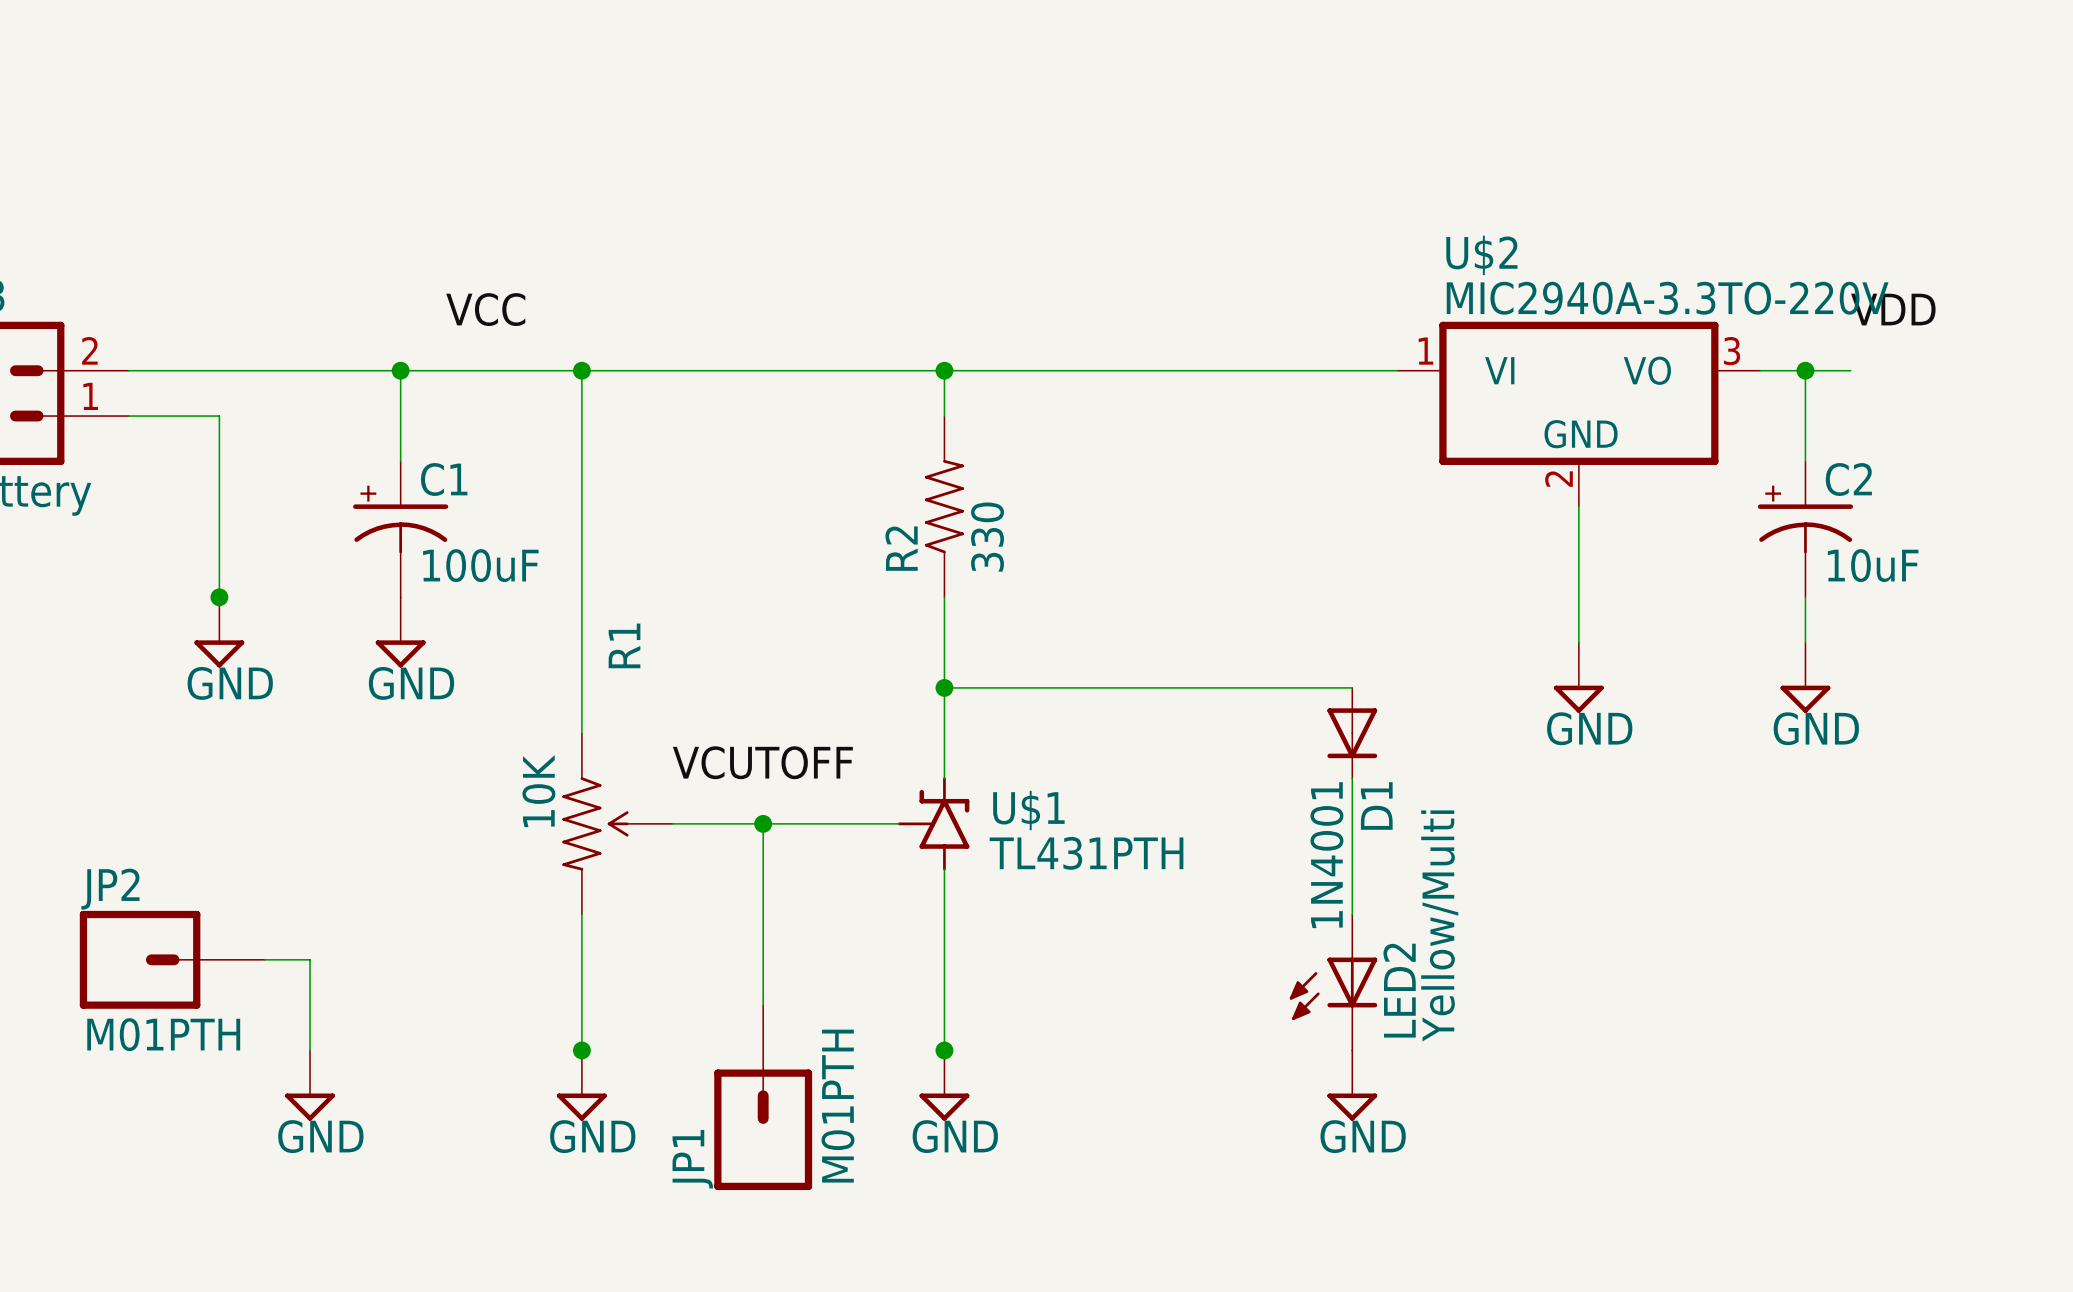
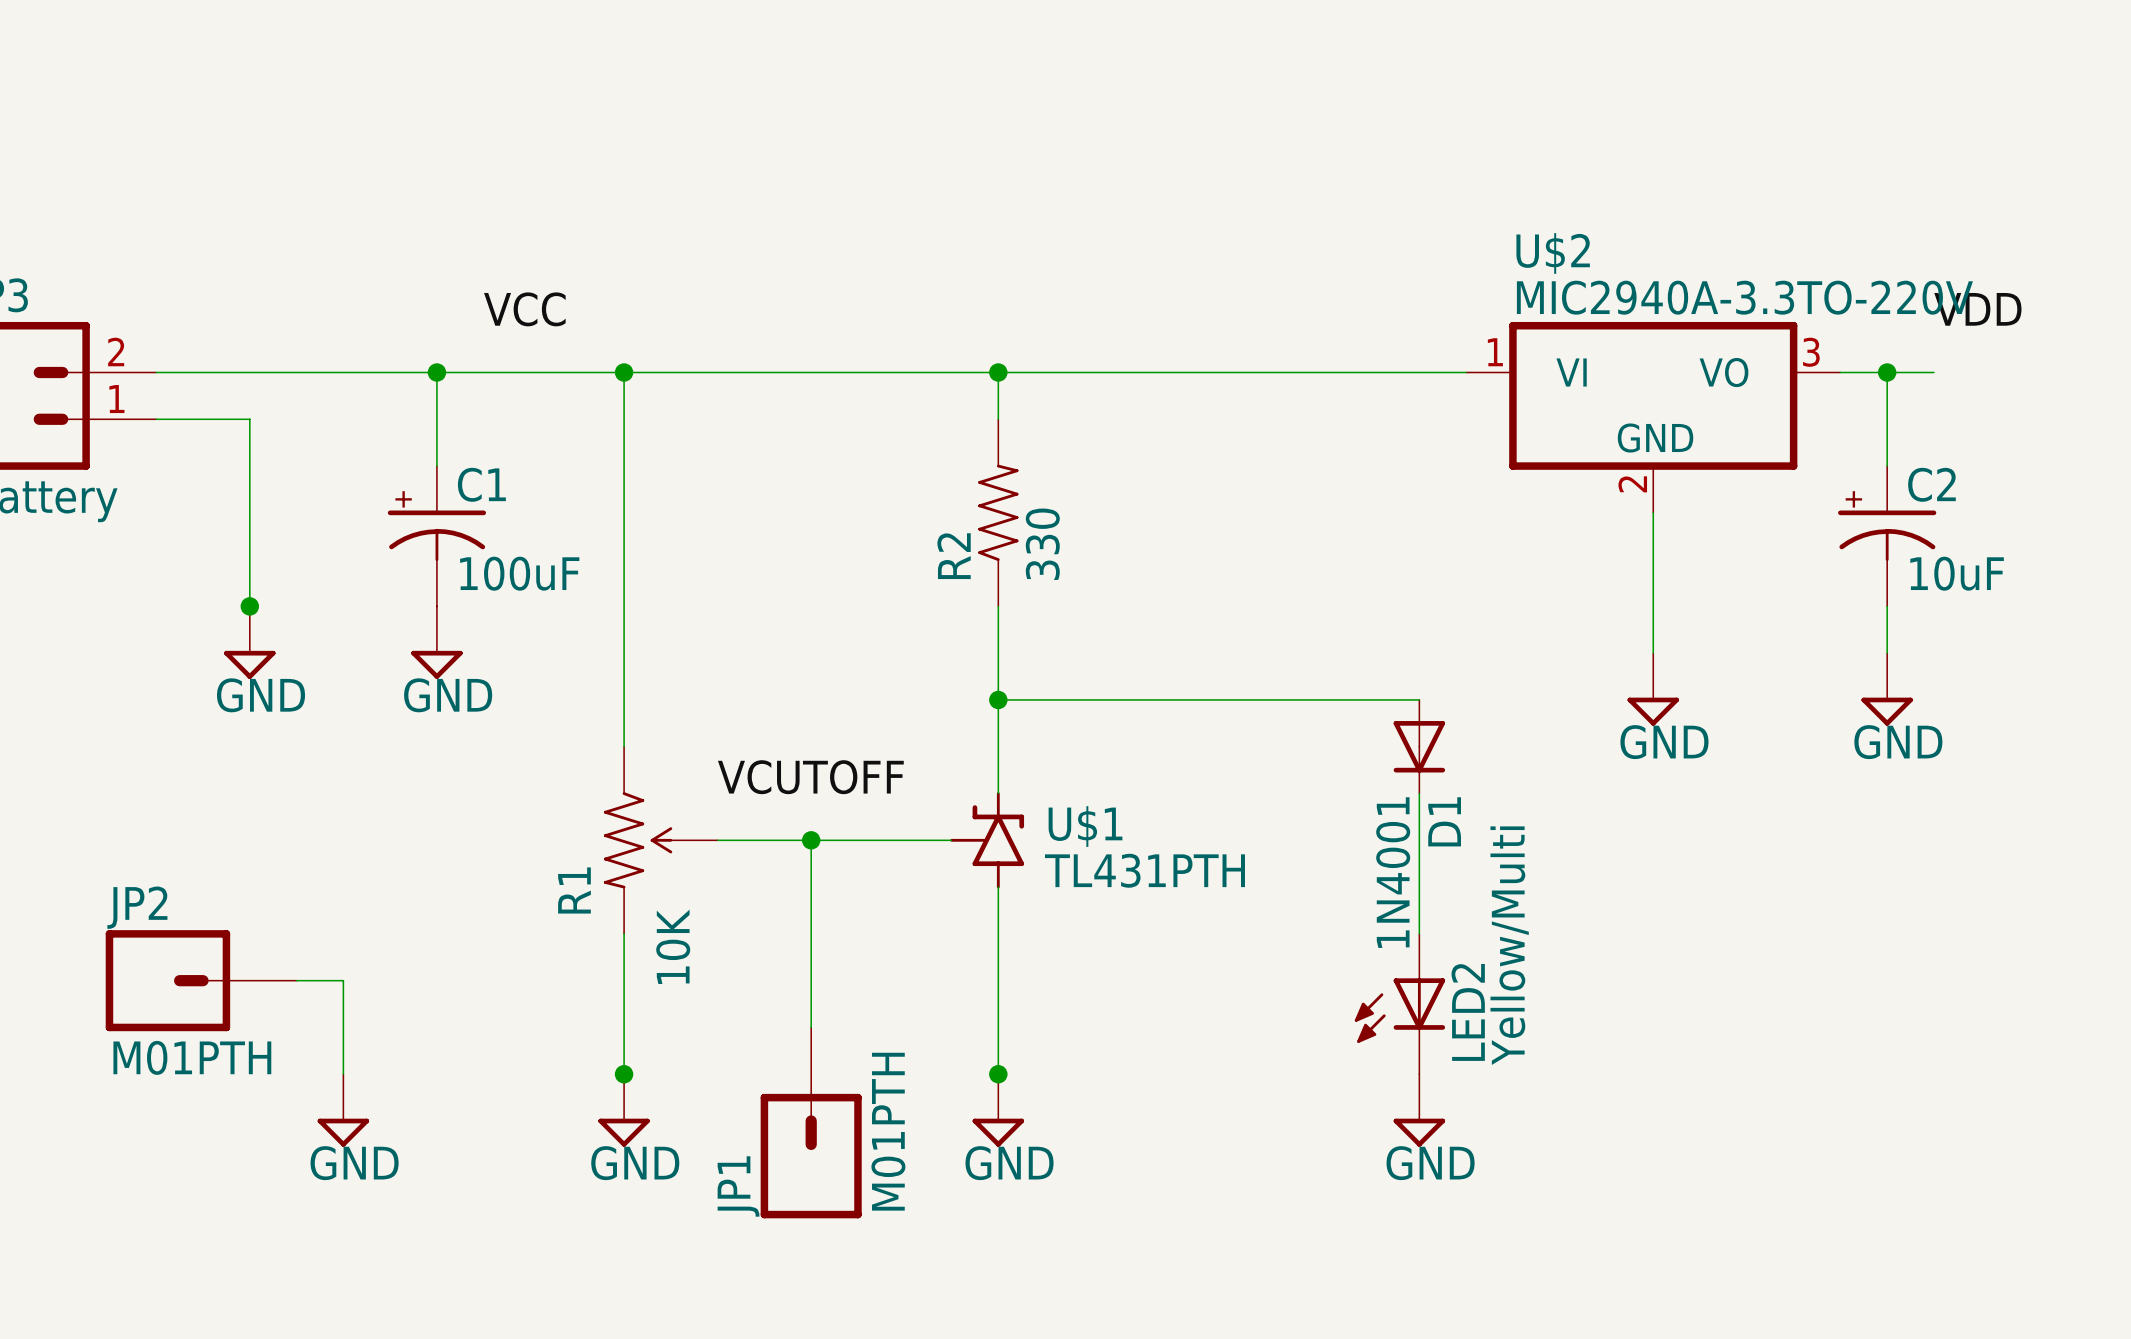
R1 name position: R1 (624, 645) -> R1 (574, 890)
R1 value position: 10K (538, 791) -> 10K (673, 946)

